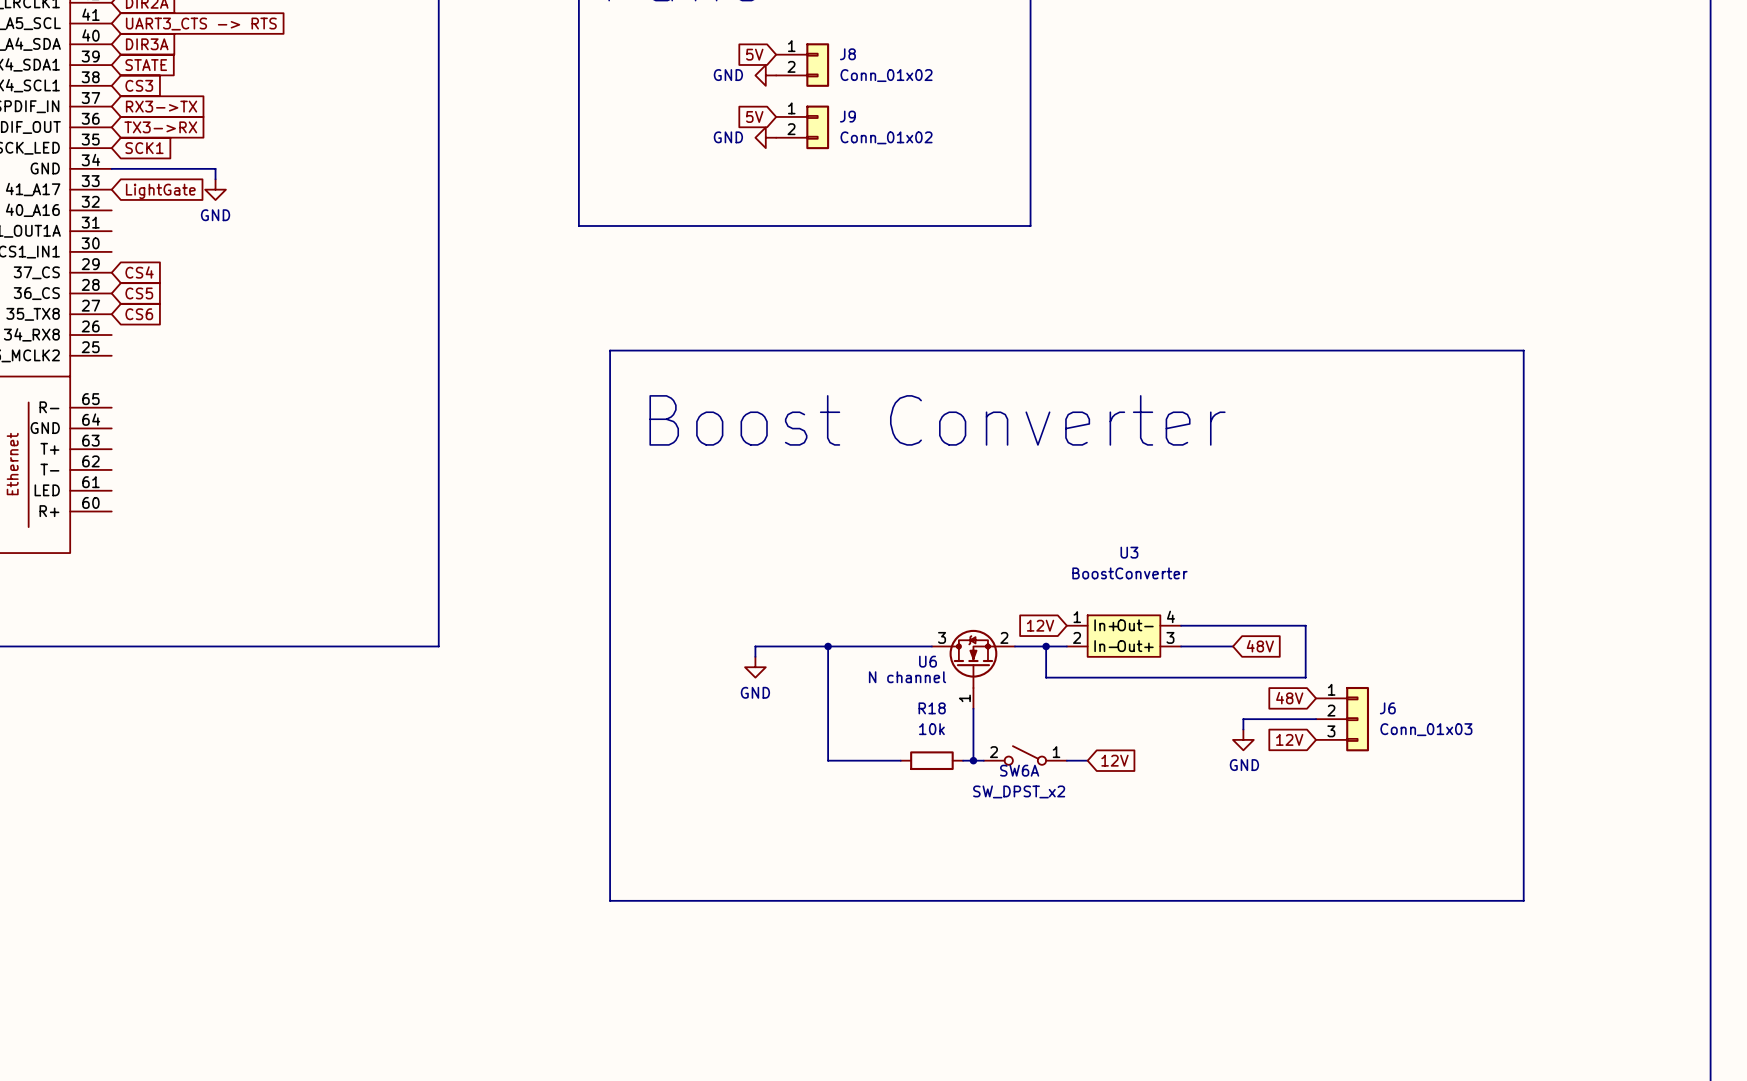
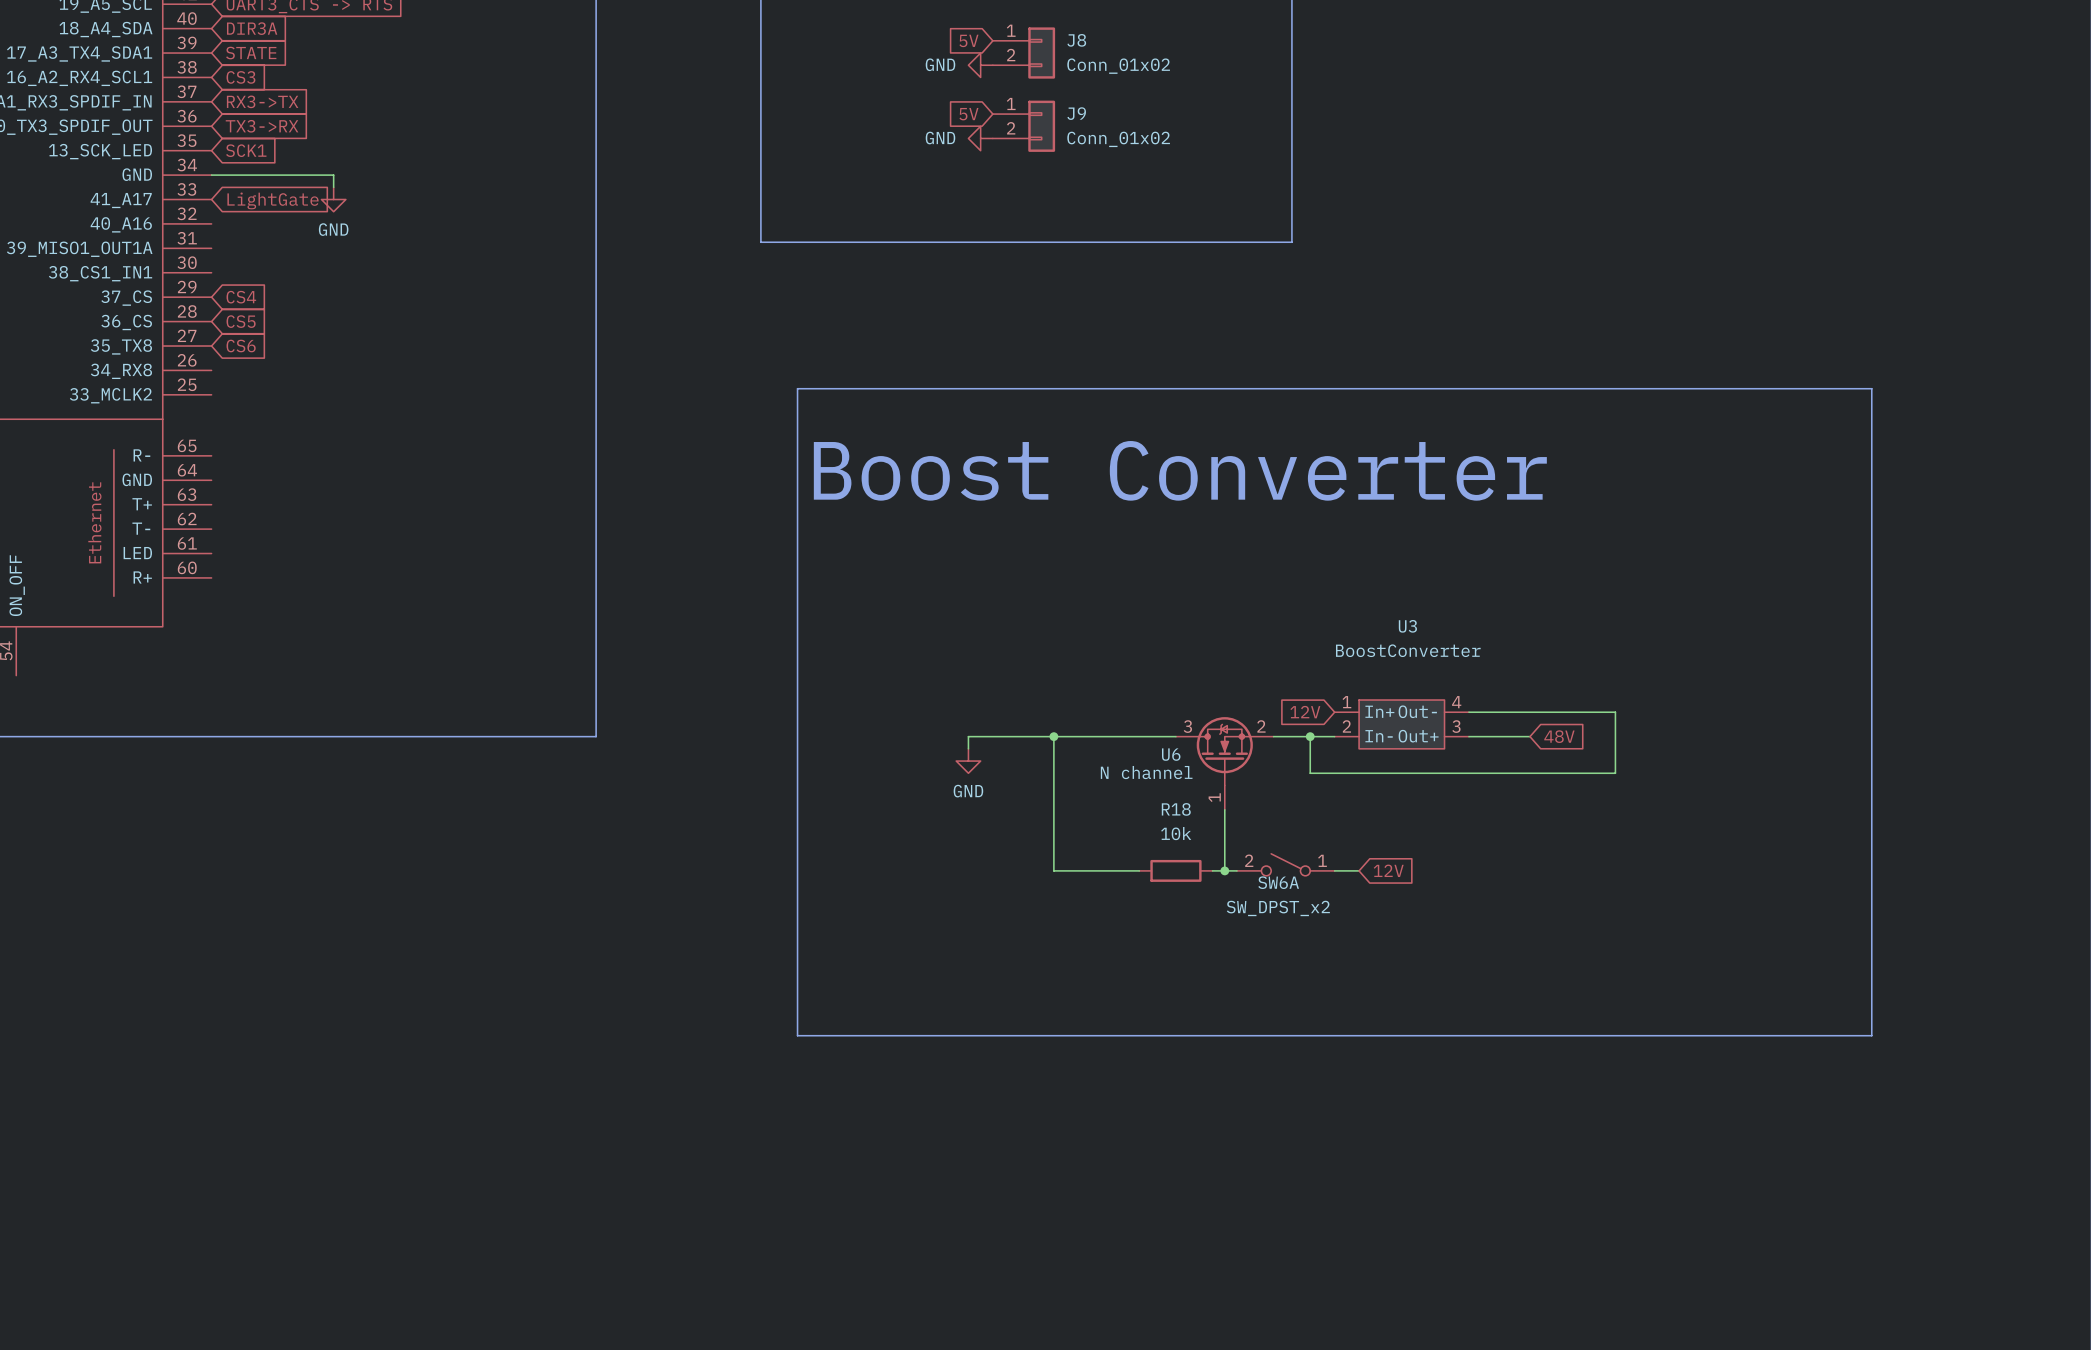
global label: 48V (1289, 698) -> none
wire: (1316, 719) (1243, 719) (1243, 729) -> none
J6: Conn_01x03 (1342, 719) -> none
power symbol: GND (1243, 739) -> none
global label: 12V (1289, 739) -> none

